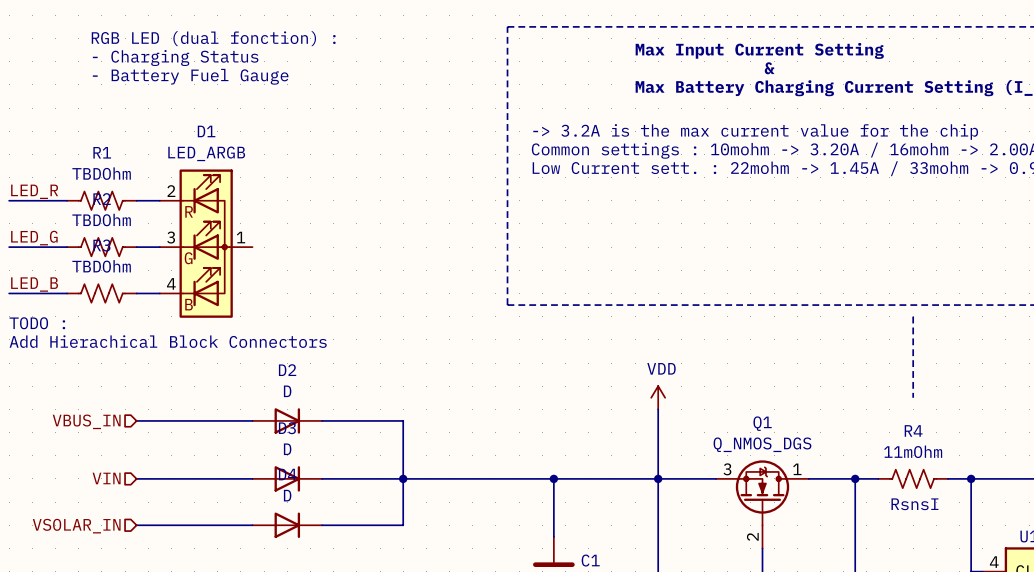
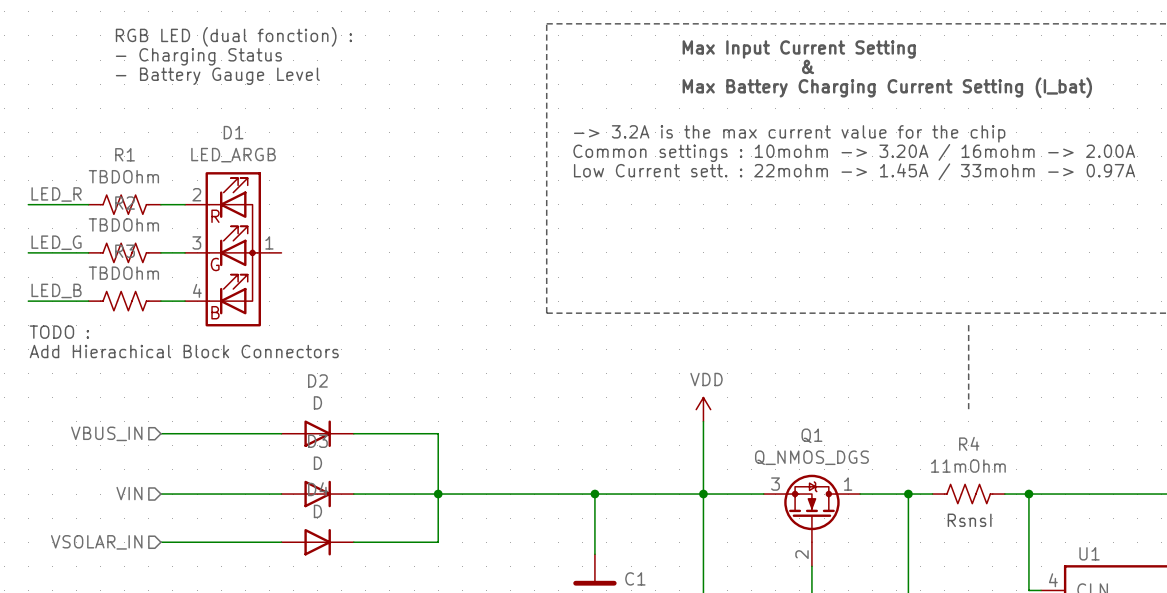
text: - Battery Fuel Gauge (190, 76) -> - Battery Gauge Level (217, 76)

